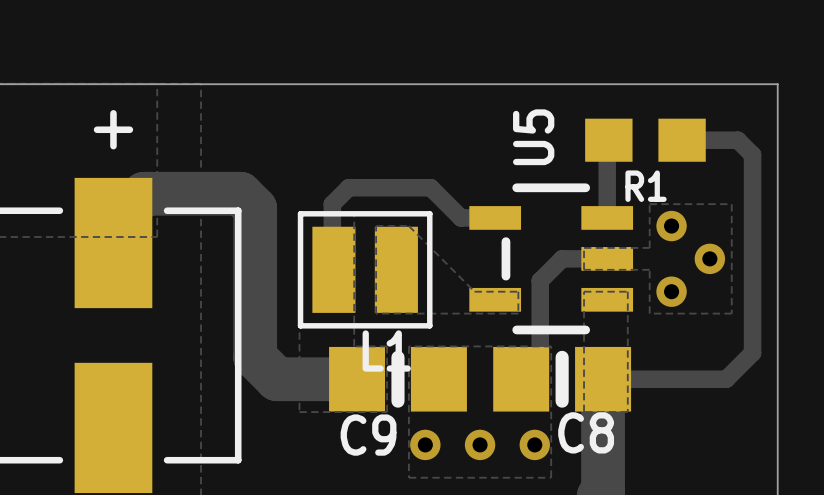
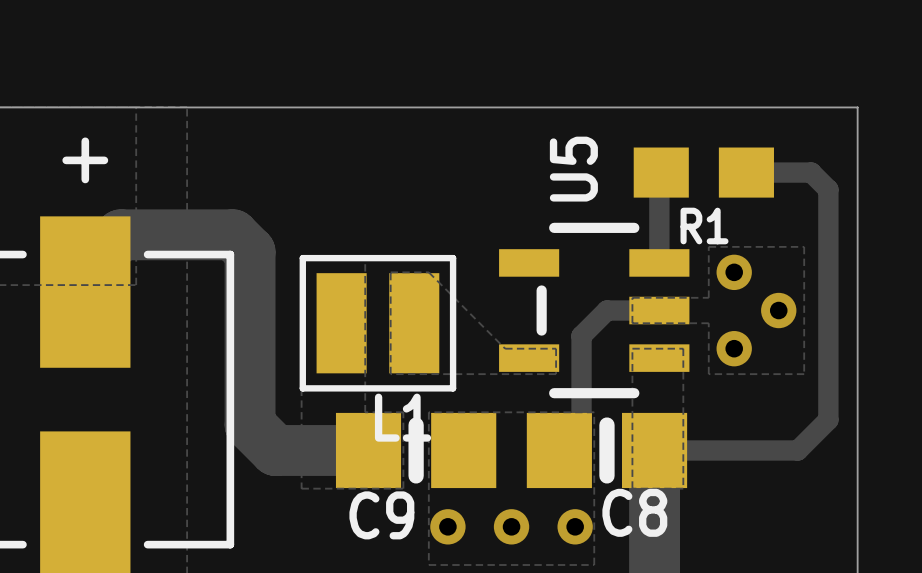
track: (495, 217) (461, 217) (430, 187) (348, 187) (332, 204) (332, 268) (333, 269) -> none

